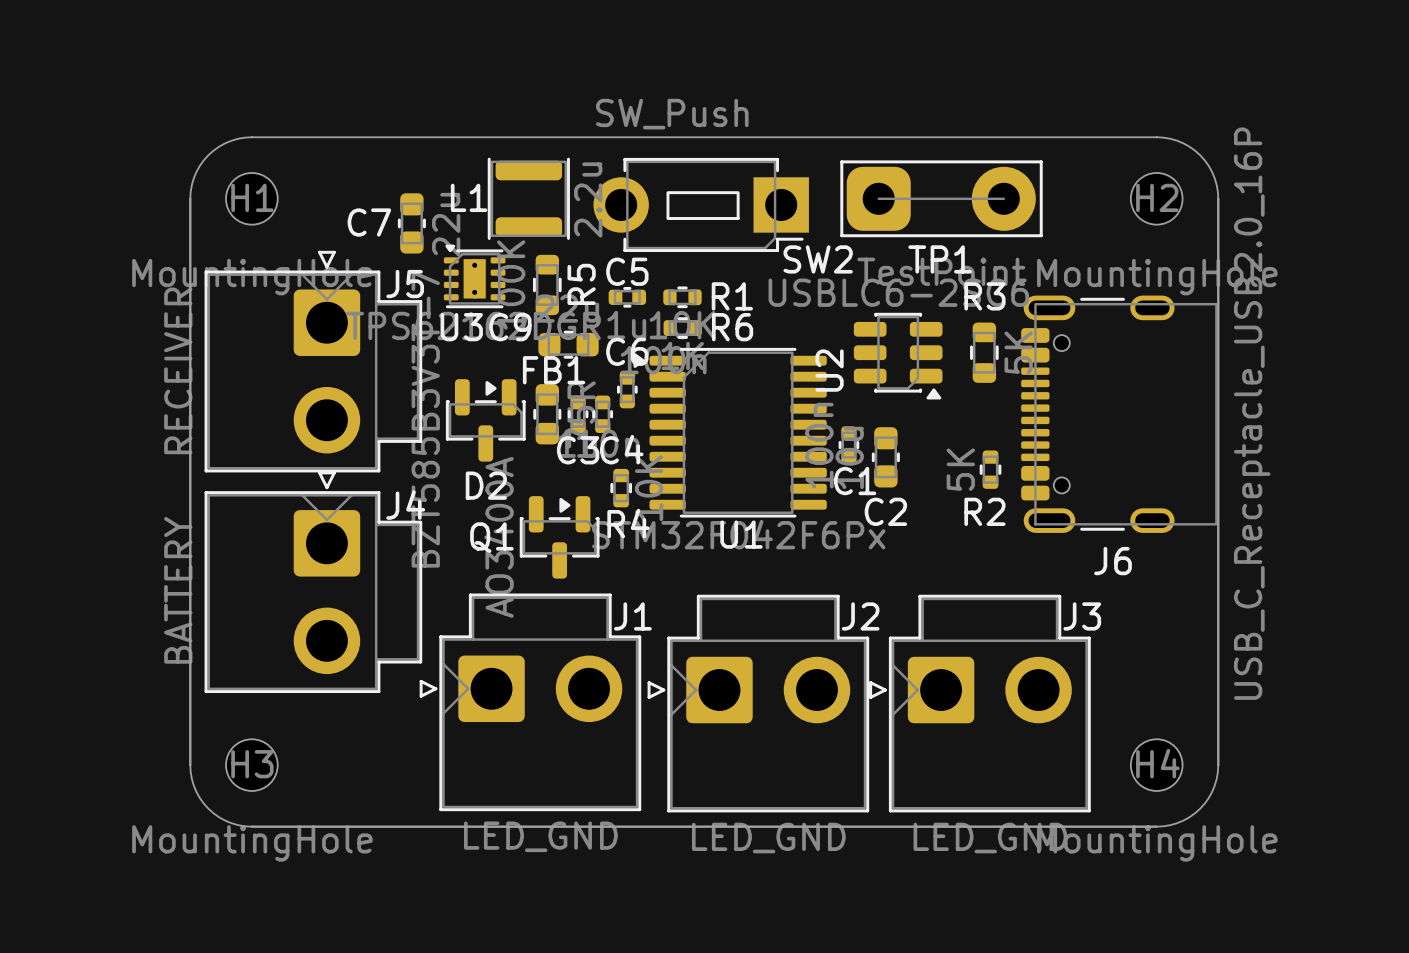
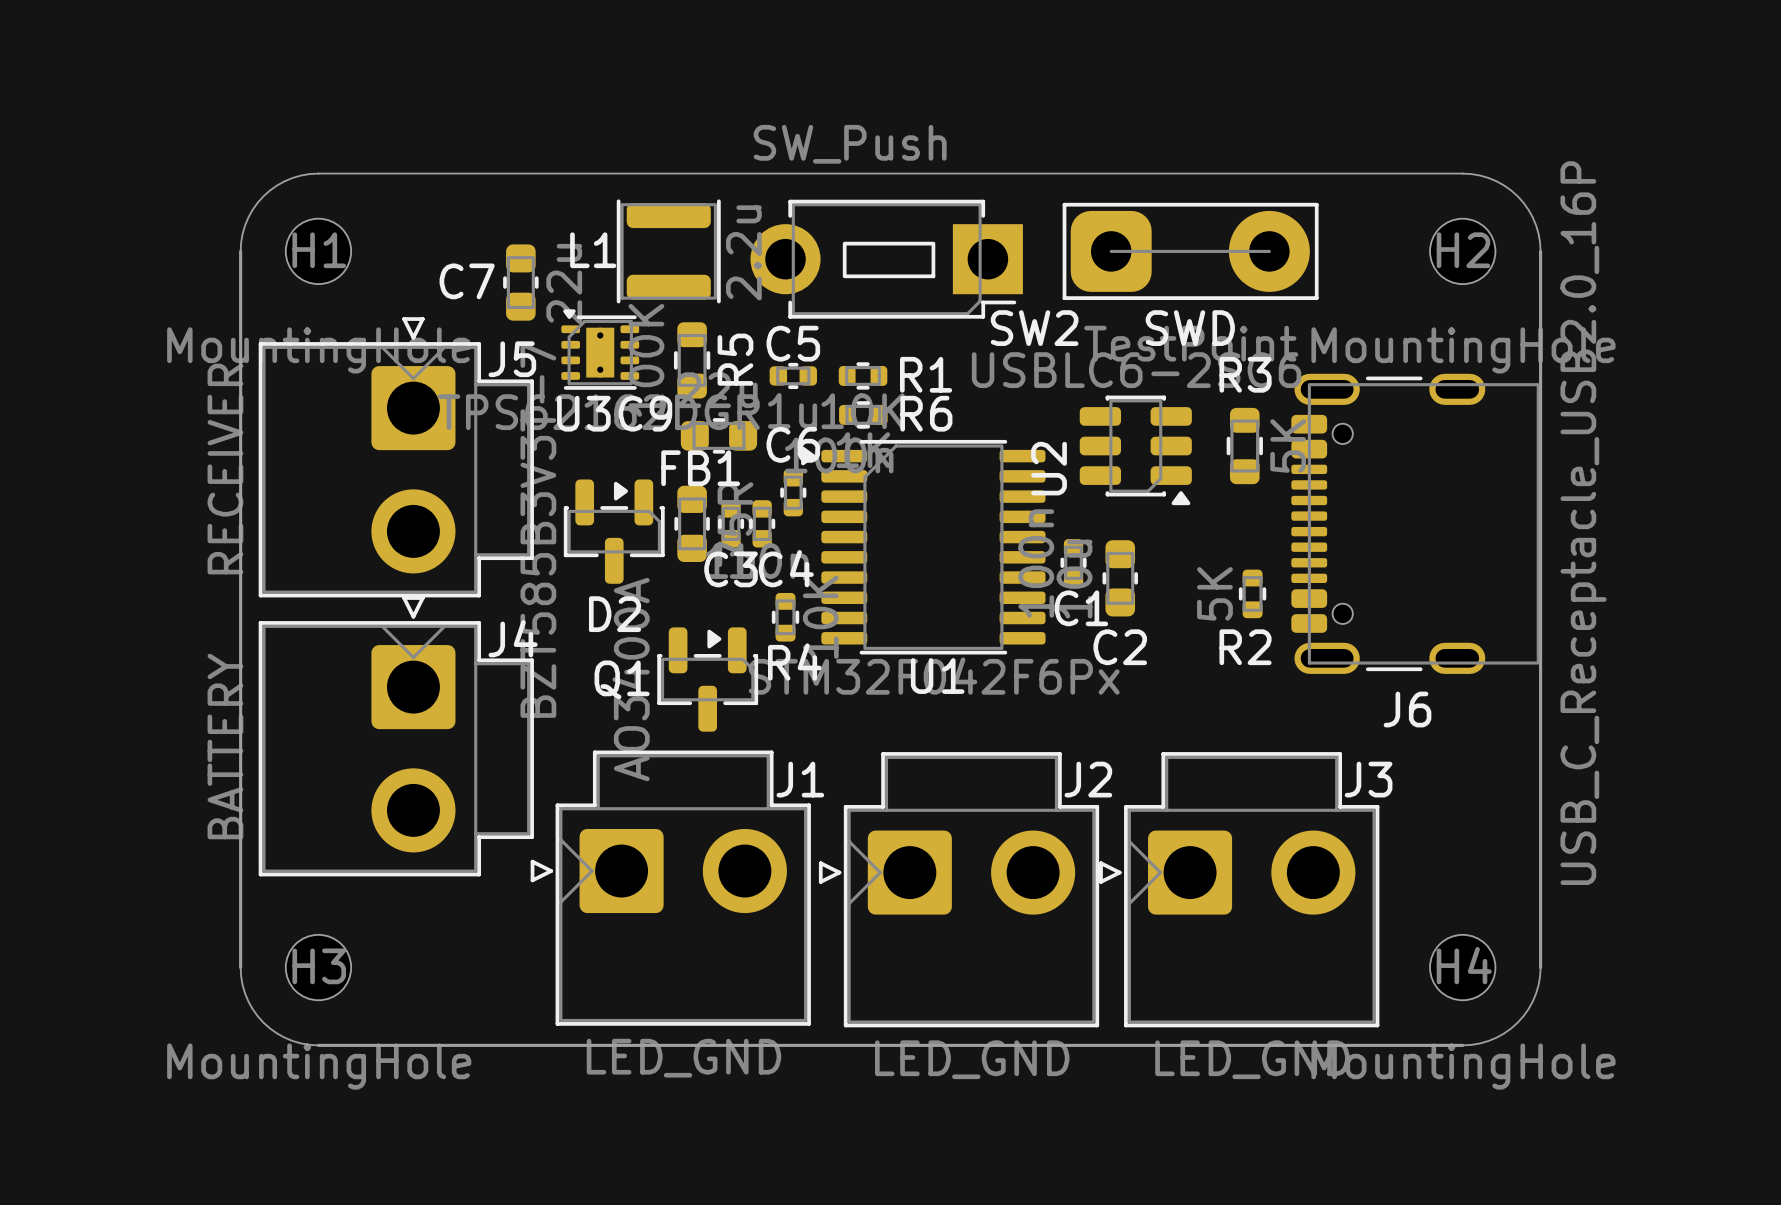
TP1 name: TP1 (940, 259) -> SWD (1190, 328)

